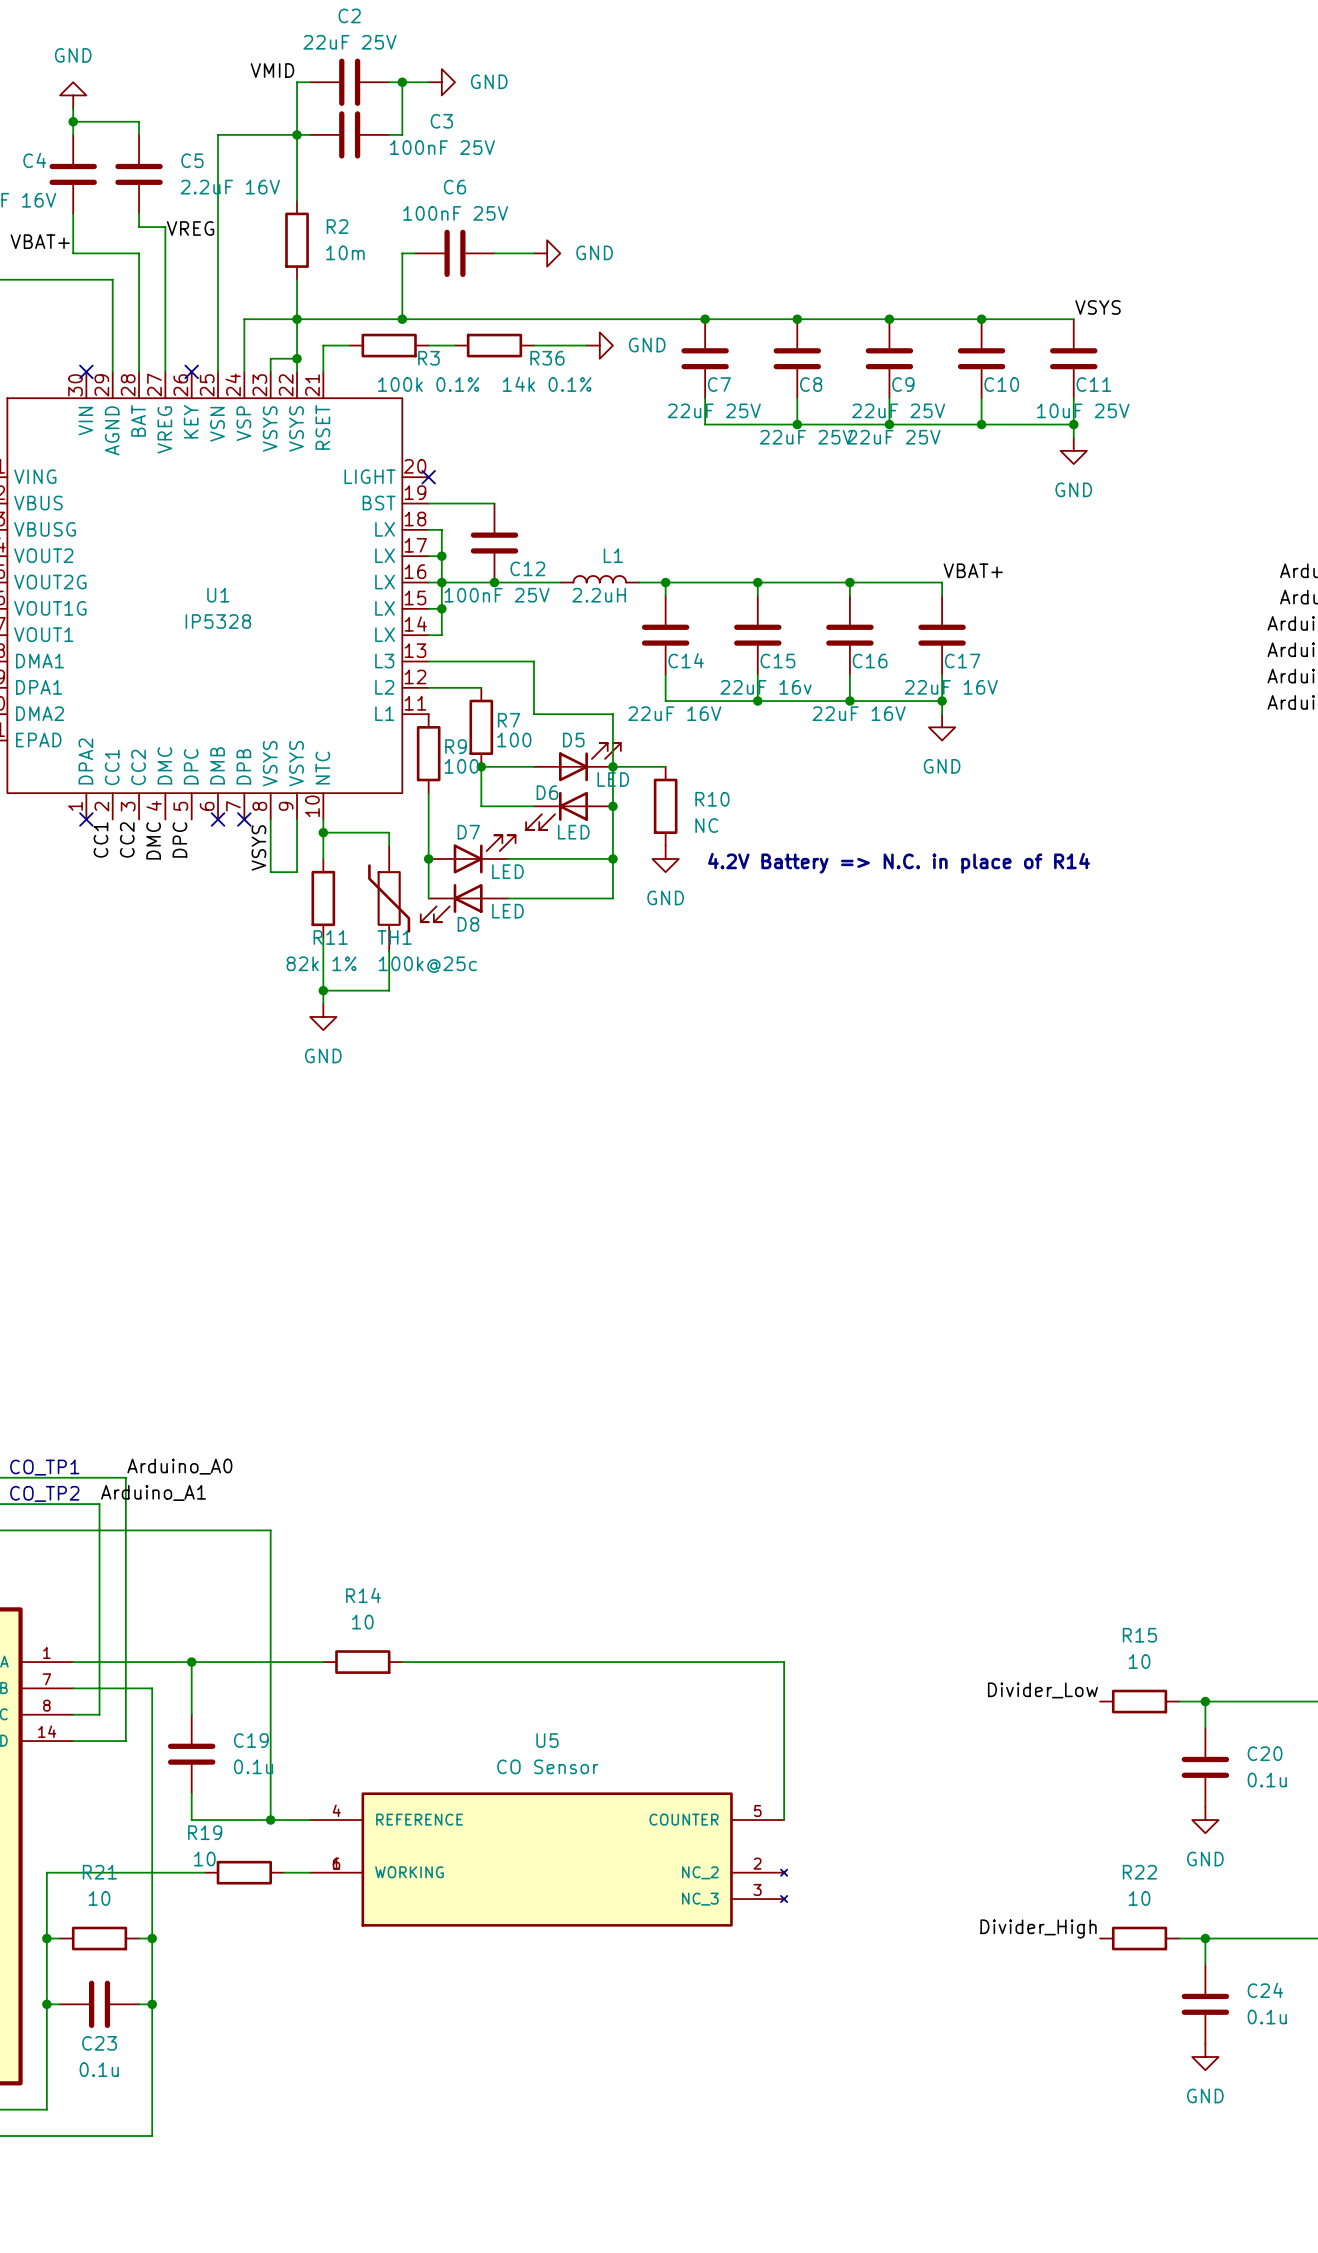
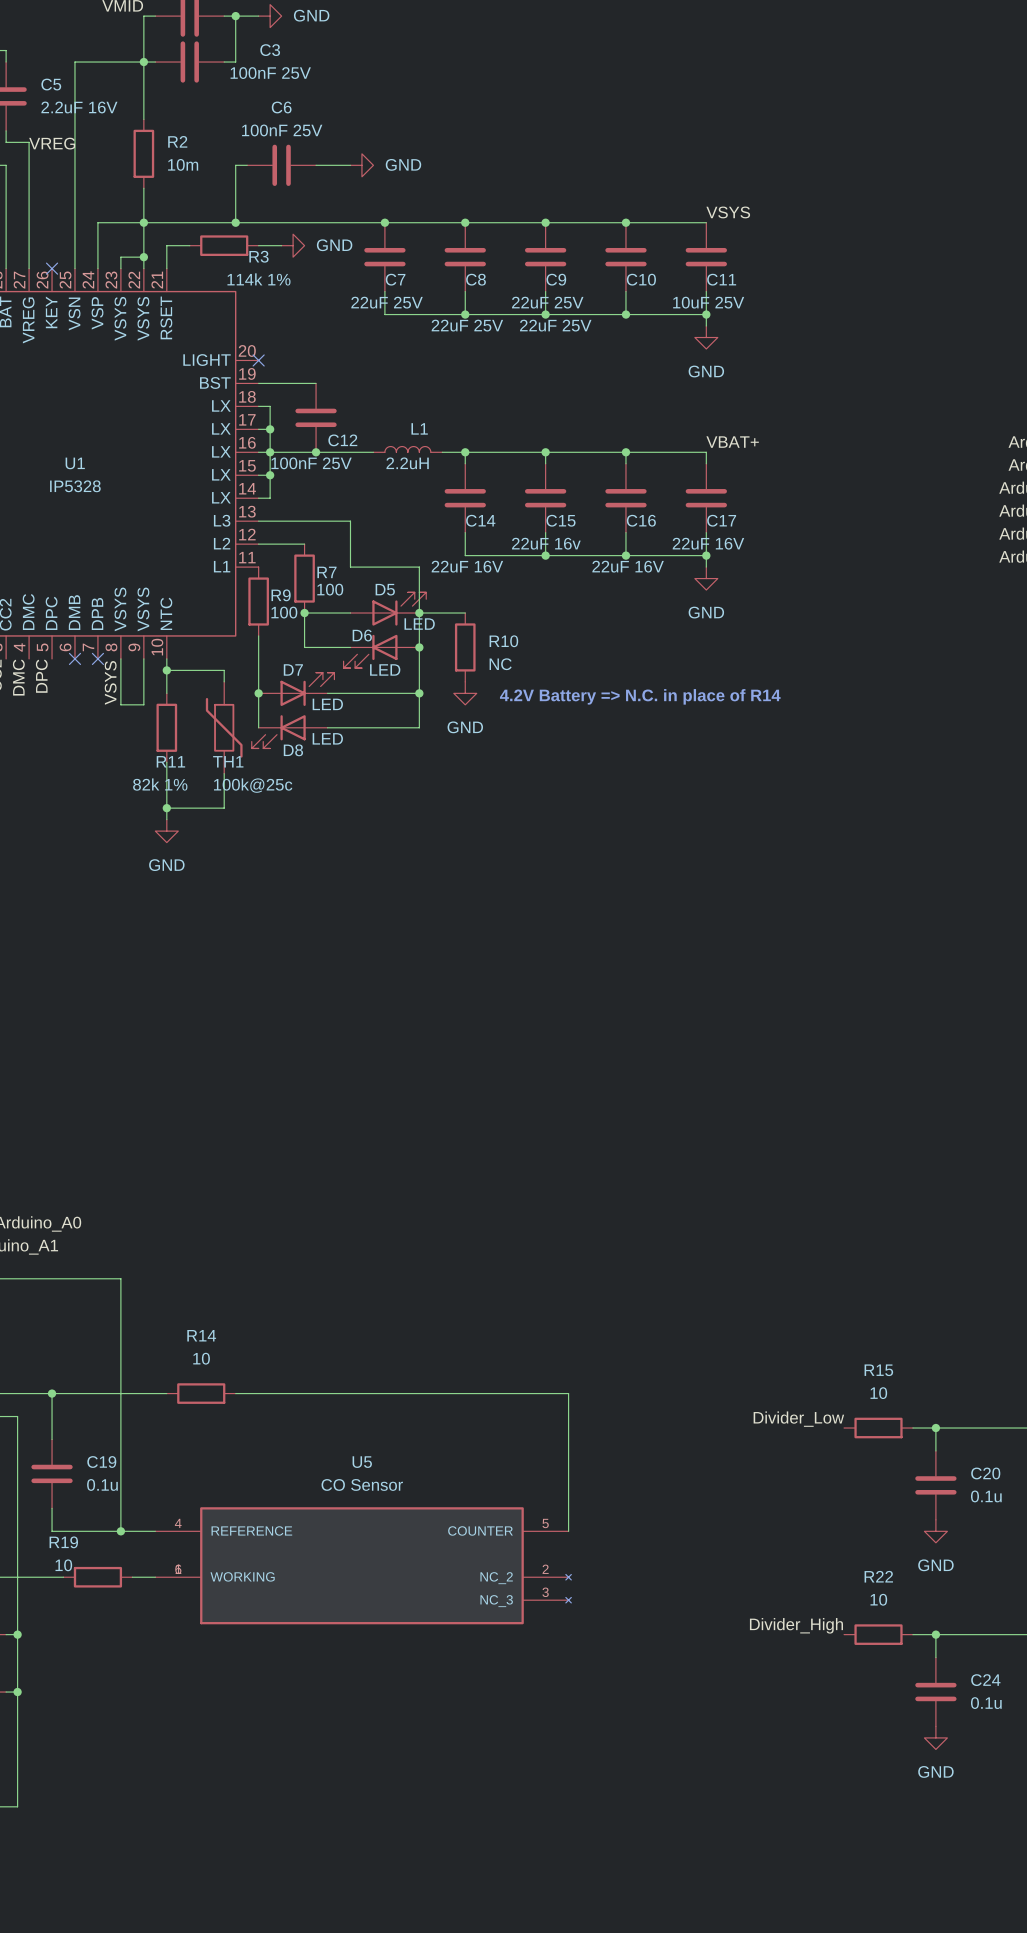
label position: VSYS (1097, 307) -> VSYS (728, 212)
junction: none -> (384, 222)
junction: none -> (465, 222)
junction: (705, 319) -> none
junction: none -> (545, 222)
junction: (797, 319) -> none
junction: none -> (625, 222)
junction: (889, 319) -> none
wire: (942, 319) (1073, 319) -> none
junction: (981, 319) -> none
R36: 14k 0.1% (494, 345) -> none
wire: (533, 345) (586, 345) -> none
power symbol position: GND (599, 345) -> GND (293, 245)
C7 position: (705, 358) -> (384, 257)
C8 position: (797, 358) -> (465, 257)
C9 position: (889, 358) -> (545, 257)
C10 position: (981, 358) -> (625, 257)
C11 position: (1073, 358) -> (706, 257)
R3 value: 100k 0.1% (428, 384) -> 114k 1% (258, 279)
wire: (705, 398) (705, 424) -> (384, 291) (384, 314) (499, 314)
wire: (797, 398) (797, 424) -> (465, 291) (465, 314)
wire: (889, 398) (889, 424) -> (545, 291) (545, 314)
wire: (981, 398) (981, 424) -> (625, 291) (625, 314)
wire: (1073, 398) (1073, 437) -> (706, 291) (706, 326)
junction: none -> (465, 314)
junction: none -> (545, 314)
junction: (797, 424) -> none
junction: none -> (625, 314)
junction: (889, 424) -> none
wire: (942, 424) (1073, 424) -> none
junction: none -> (706, 314)
junction: (981, 424) -> none
junction: (1073, 424) -> none
power symbol position: GND (1073, 450) -> GND (706, 337)

